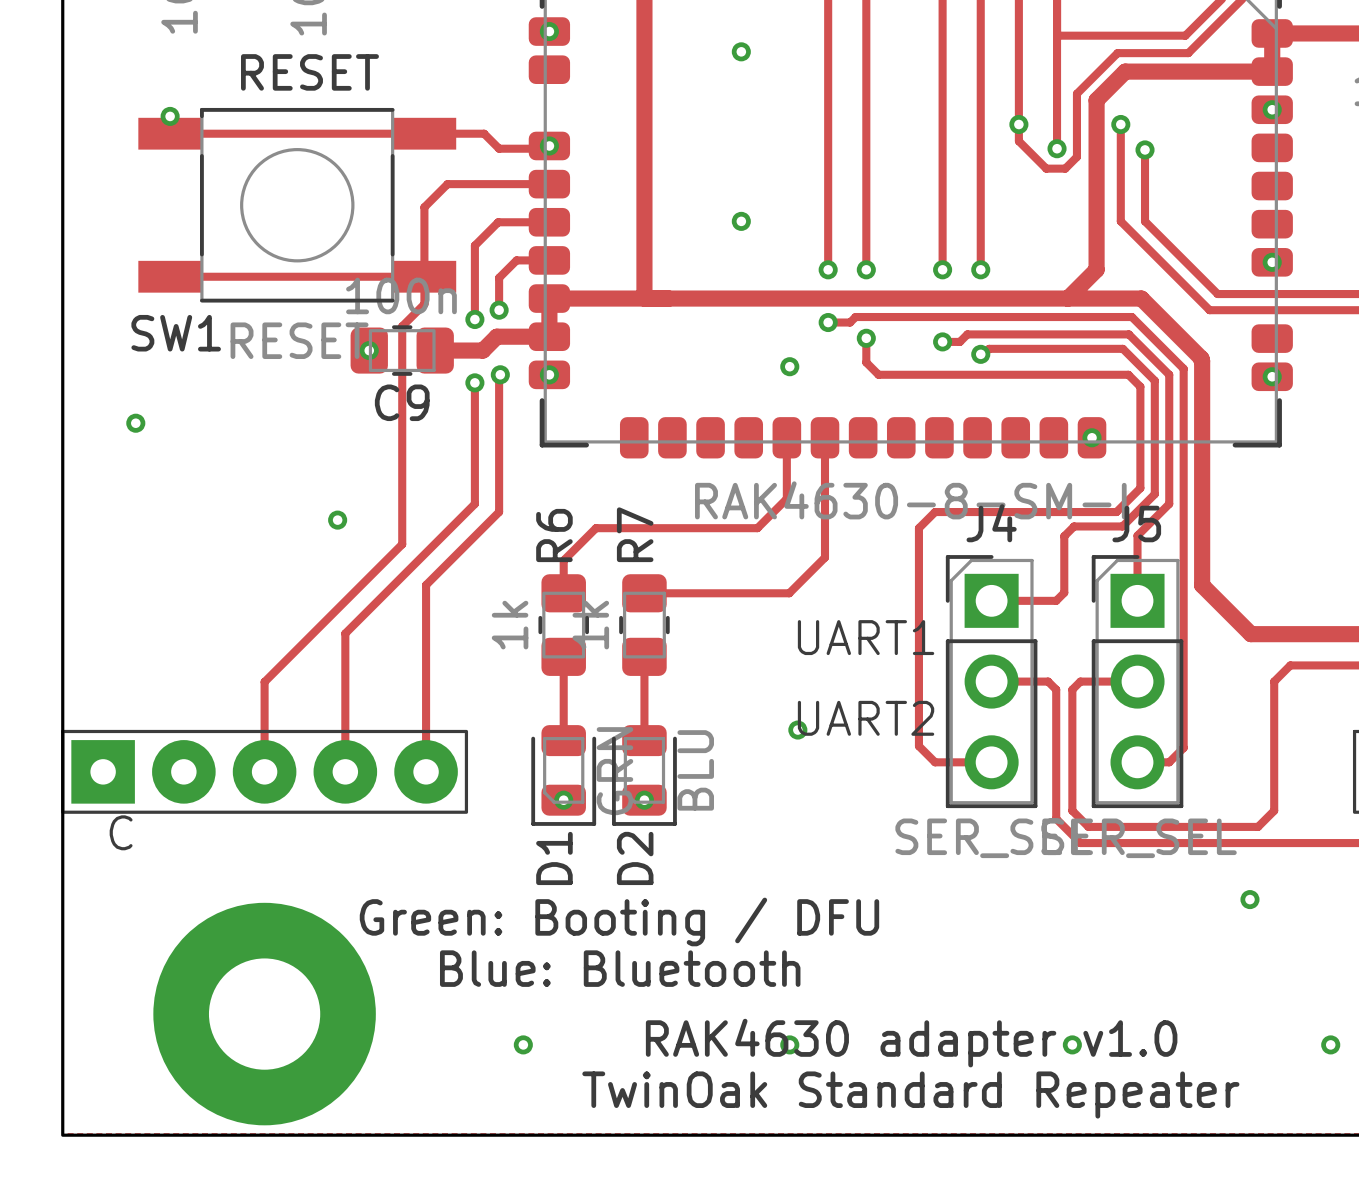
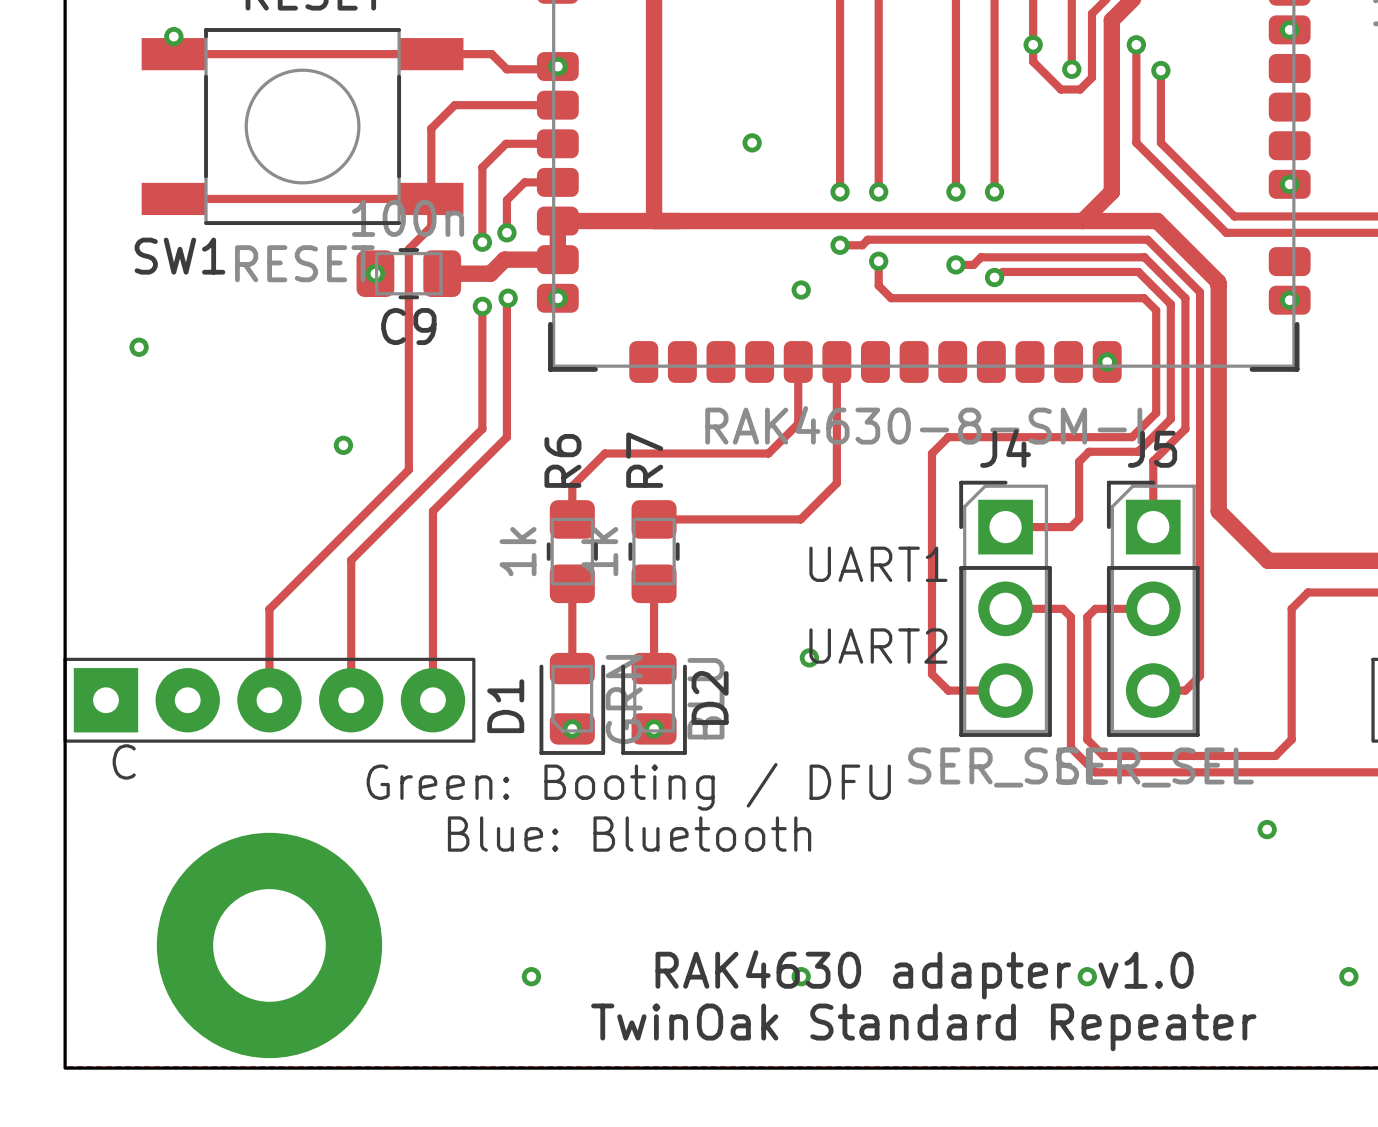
D1 name position: D1 (554, 858) -> D1 (505, 706)
D2 name position: D2 (635, 858) -> D2 (710, 697)
text position: Green: Booting / DFU (619, 921) -> Green: Booting / DFU (628, 786)
text position: Blue: Bluetooth (620, 968) -> Blue: Bluetooth (629, 834)

